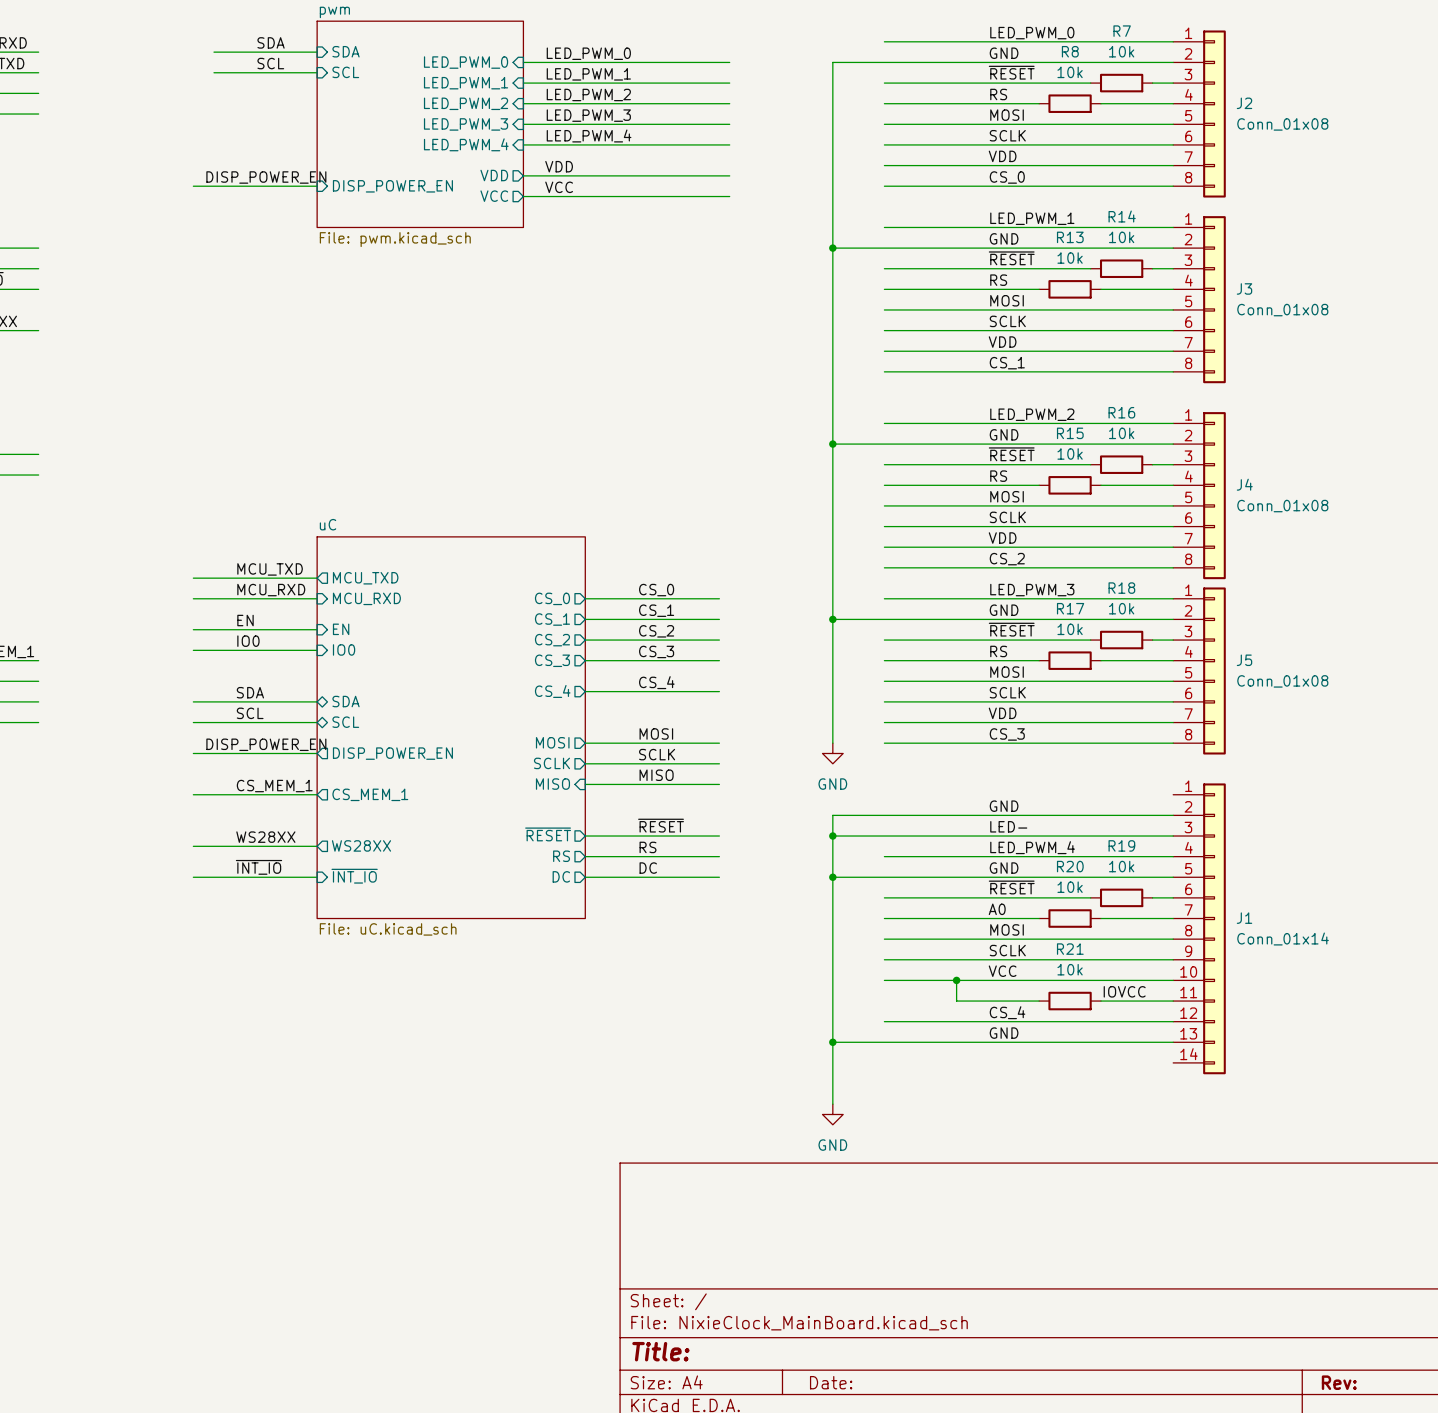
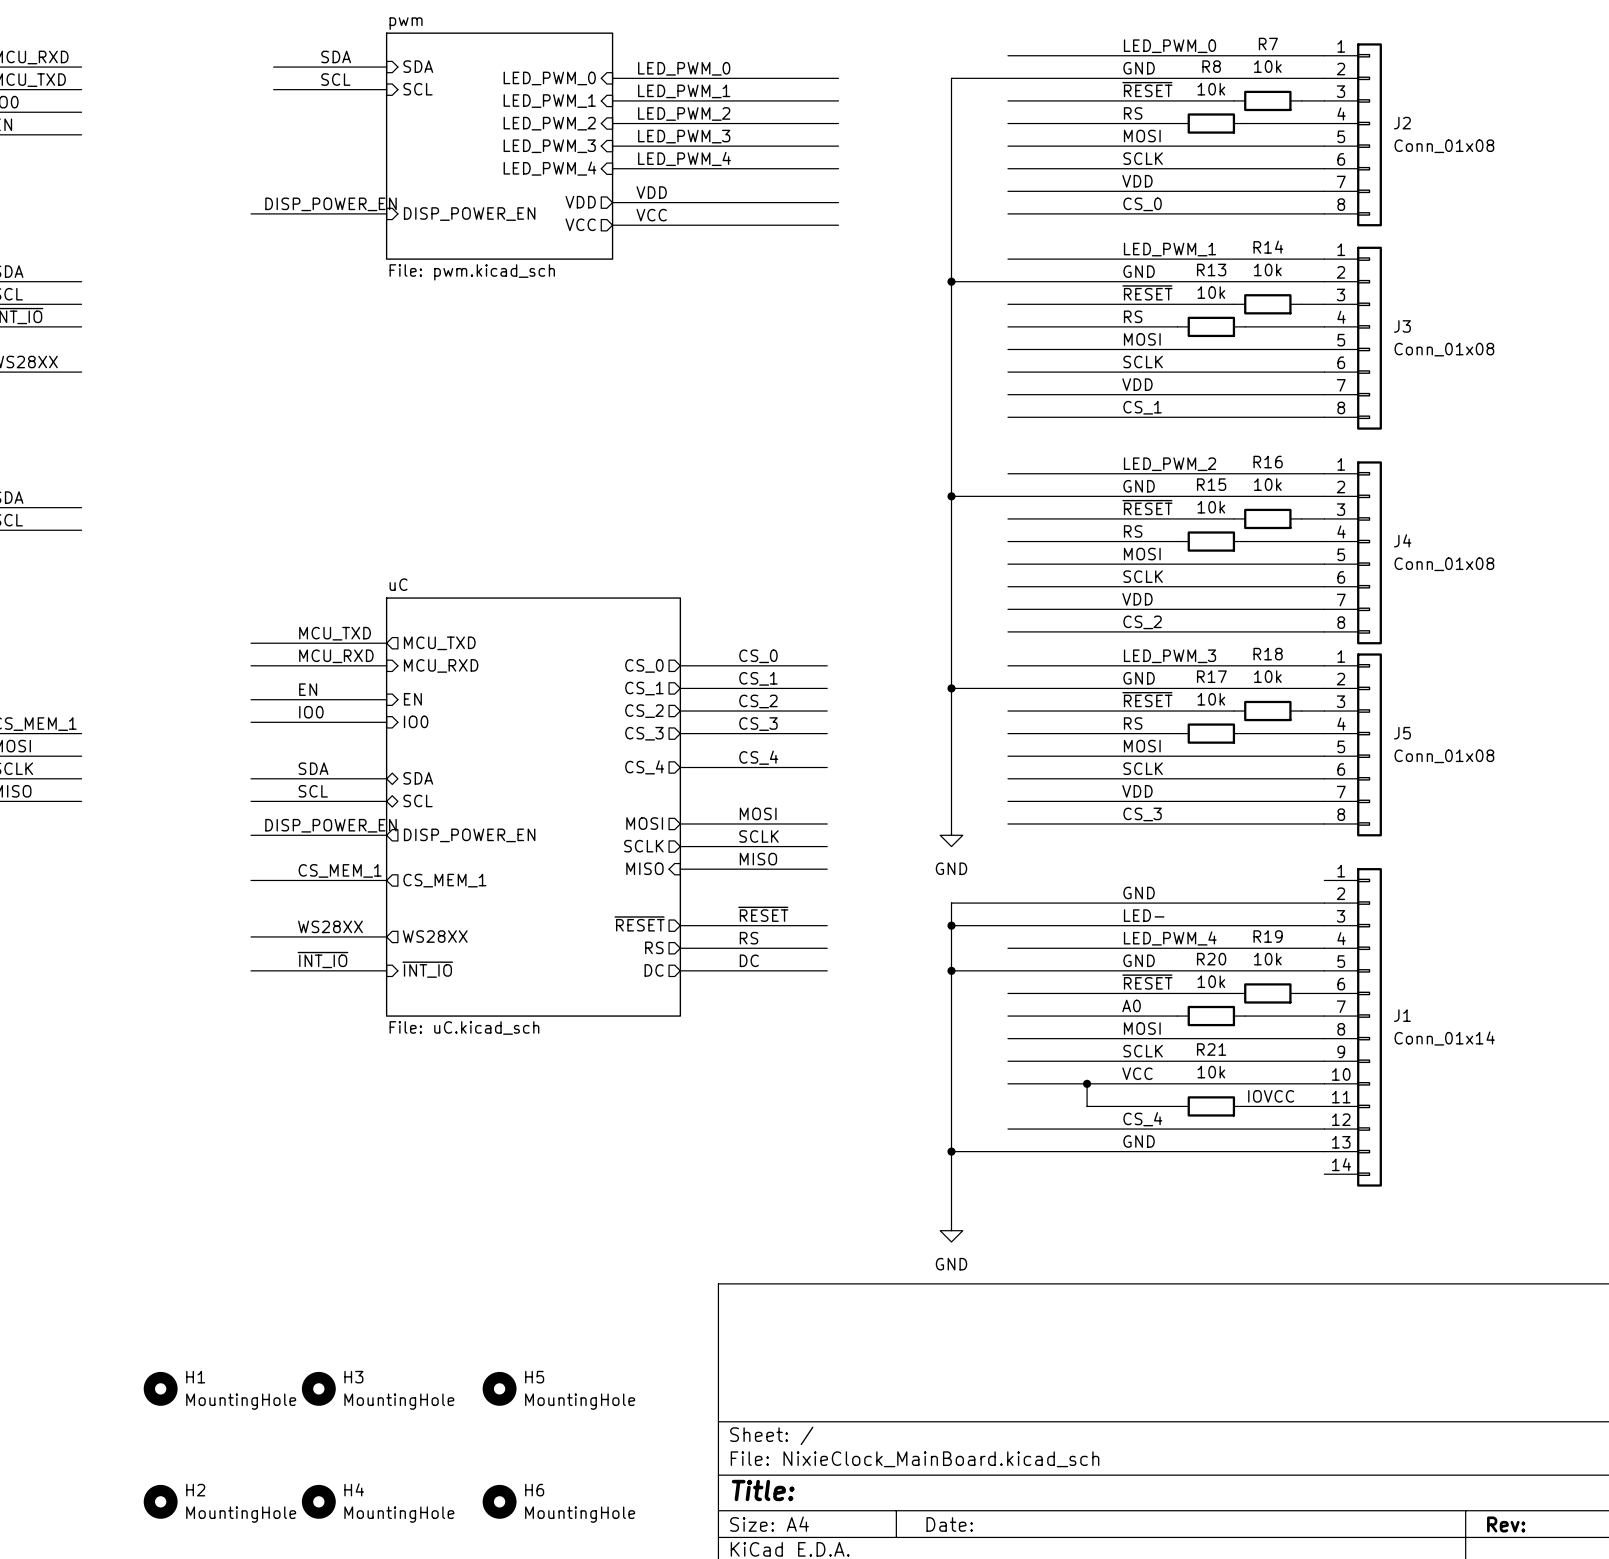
H1: none -> MountingHole (160, 1388)
H3: none -> MountingHole (318, 1388)
H5: none -> MountingHole (499, 1388)
H2: none -> MountingHole (160, 1501)
H4: none -> MountingHole (318, 1501)
H6: none -> MountingHole (499, 1501)

